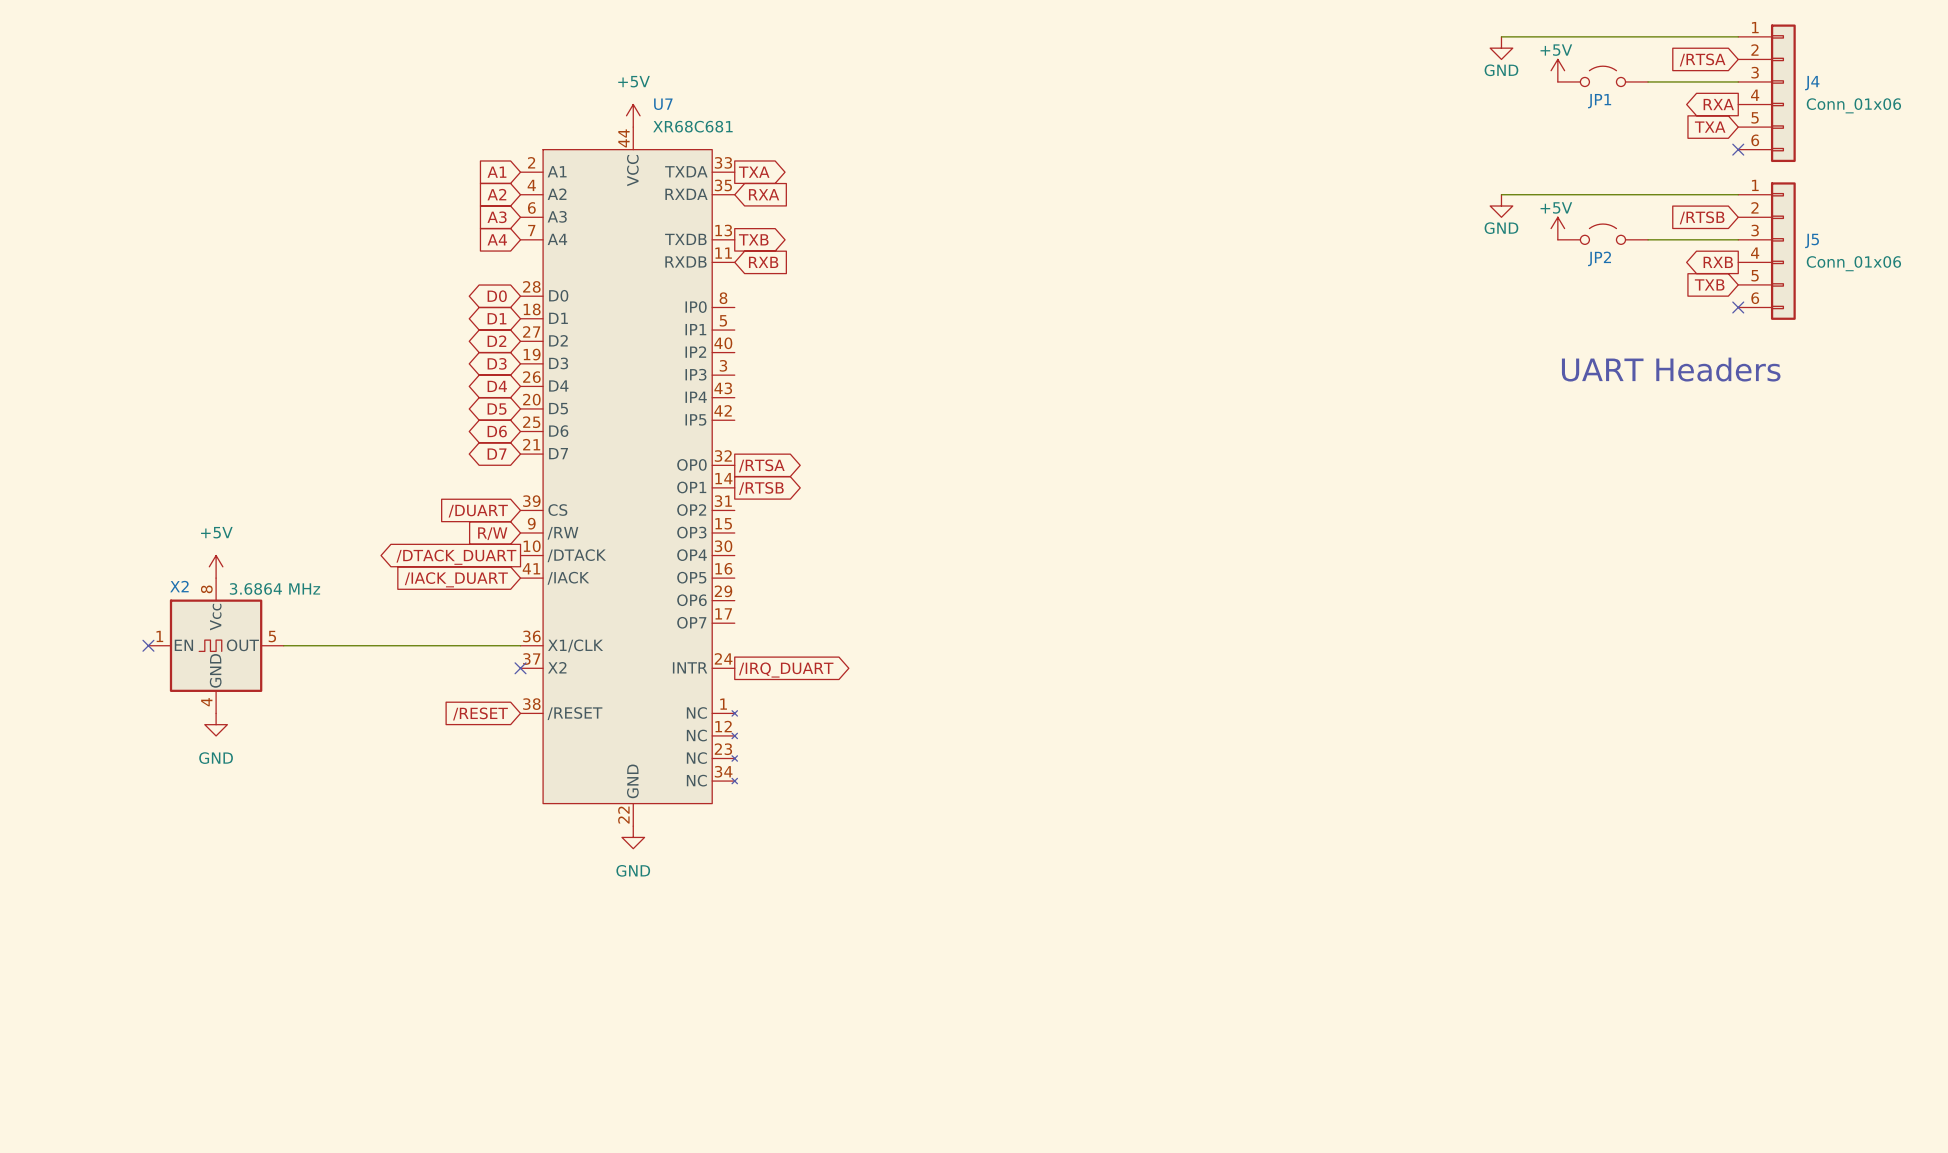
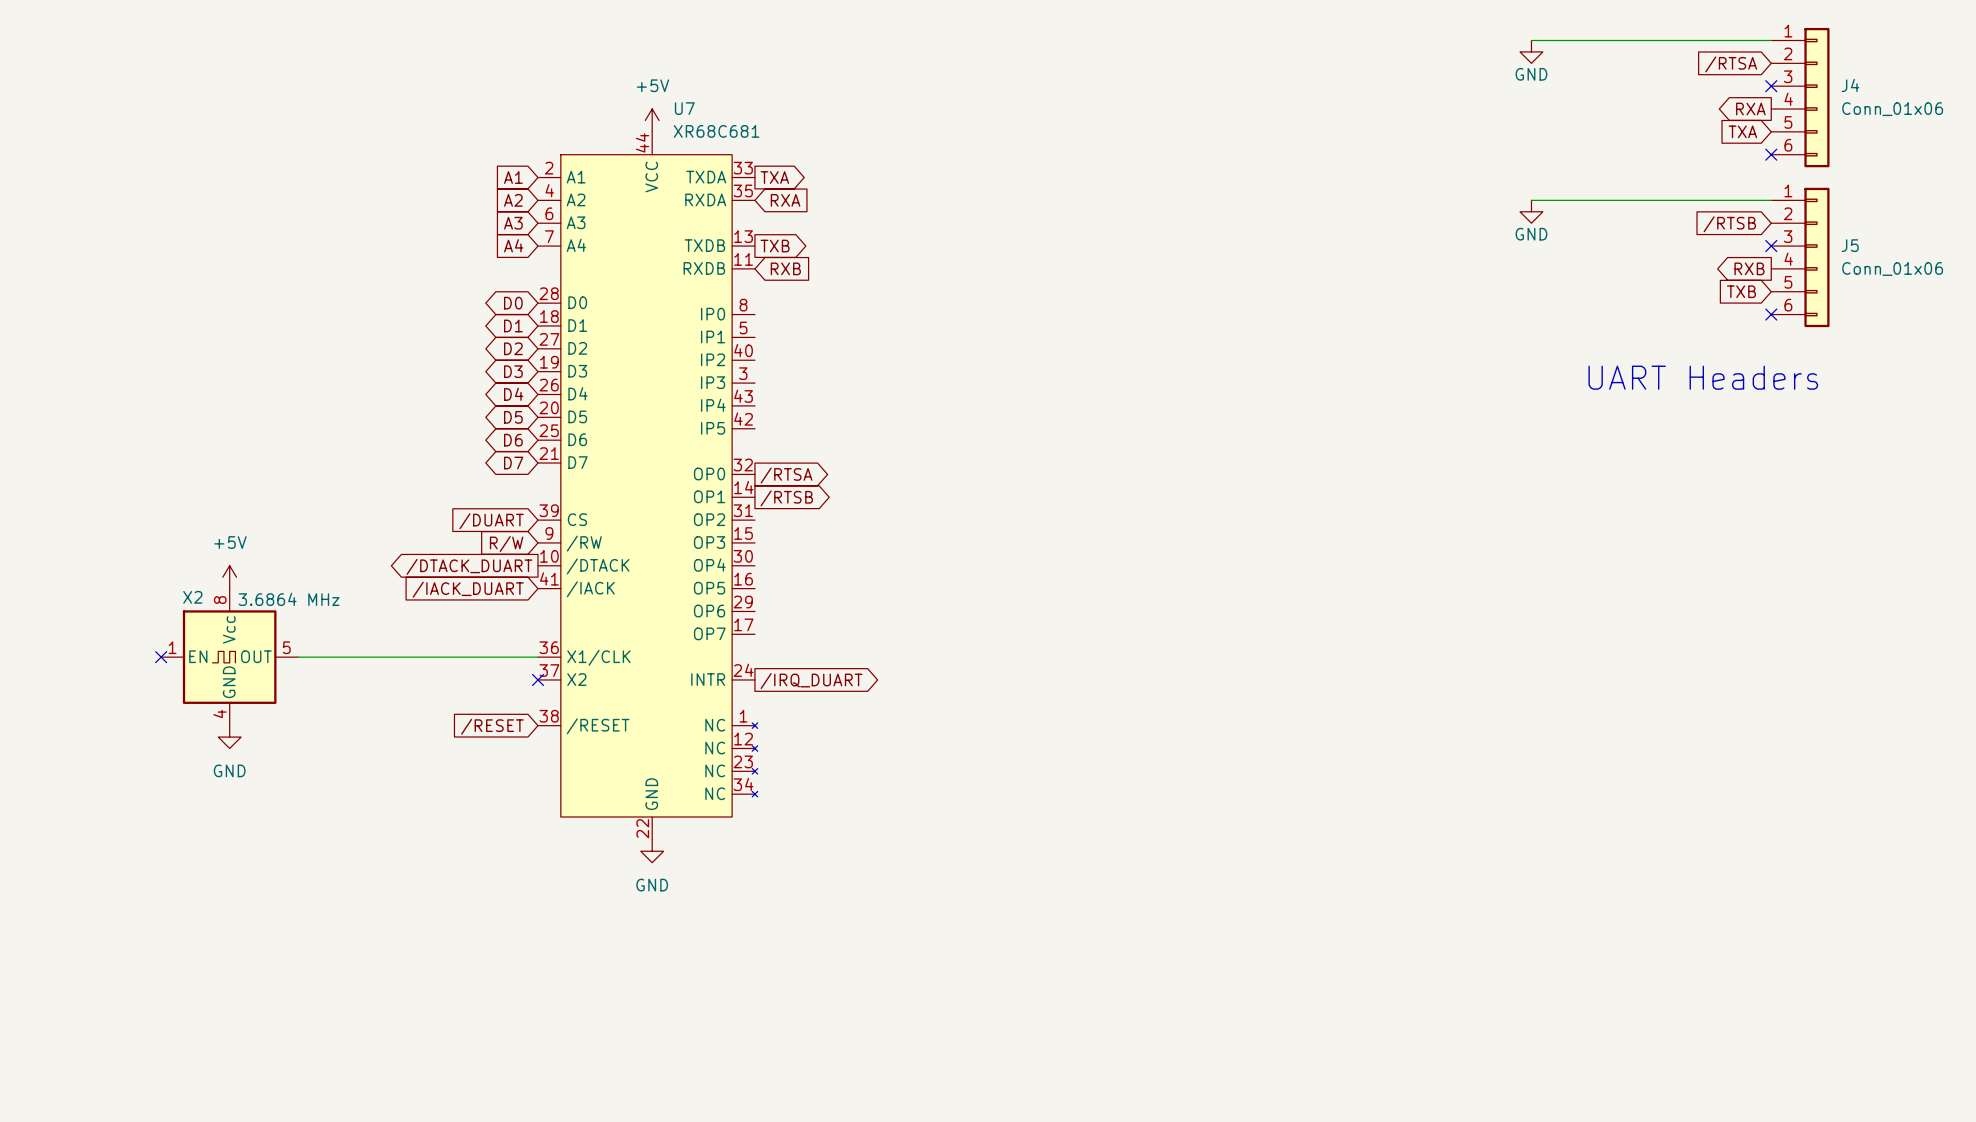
power symbol: +5V (1557, 70) -> none
JP1: (1602, 76) -> none
wire: (1648, 81) (1738, 81) -> none
no-connect mark: none -> (1771, 86)
power symbol: +5V (1557, 228) -> none
JP2: (1602, 234) -> none
wire: (1648, 239) (1738, 239) -> none
no-connect mark: none -> (1771, 246)

